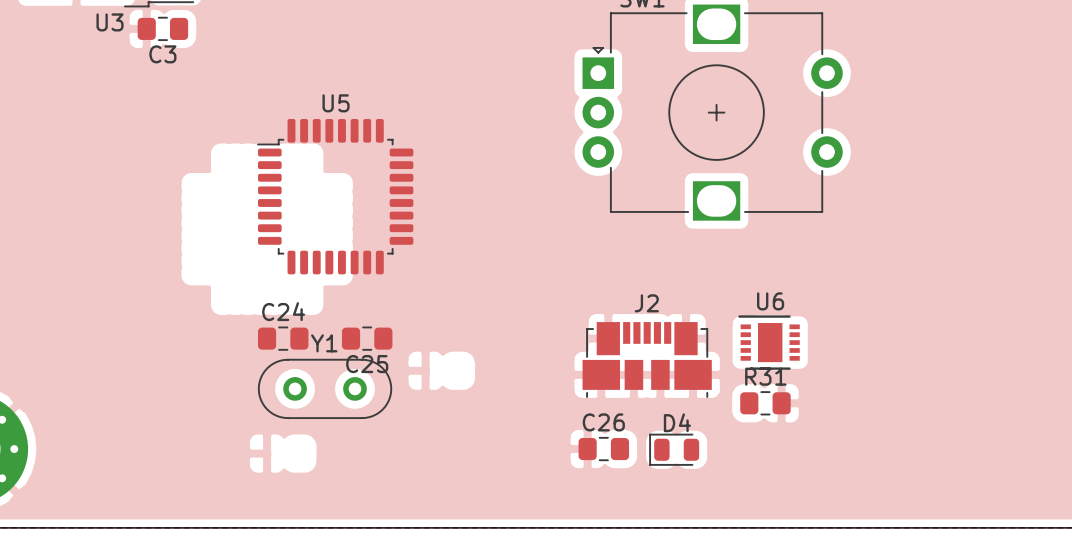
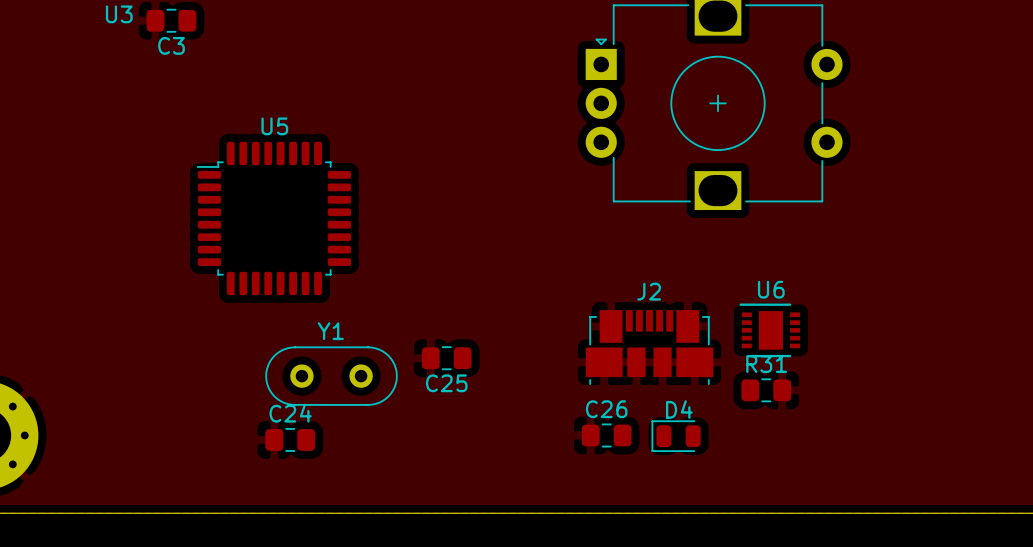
U5 position: (335, 196) -> (273, 218)
C24 position: (283, 338) -> (290, 439)
C25 position: (367, 338) -> (446, 358)

